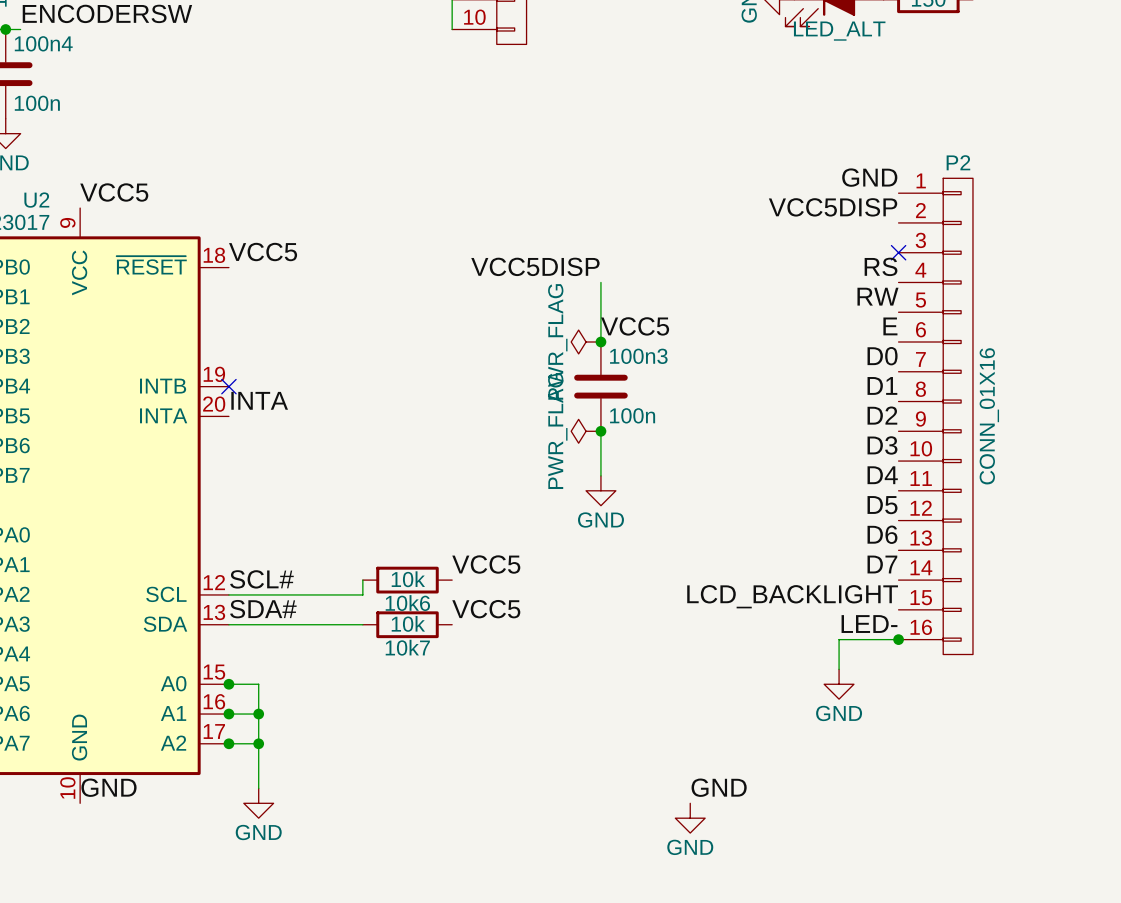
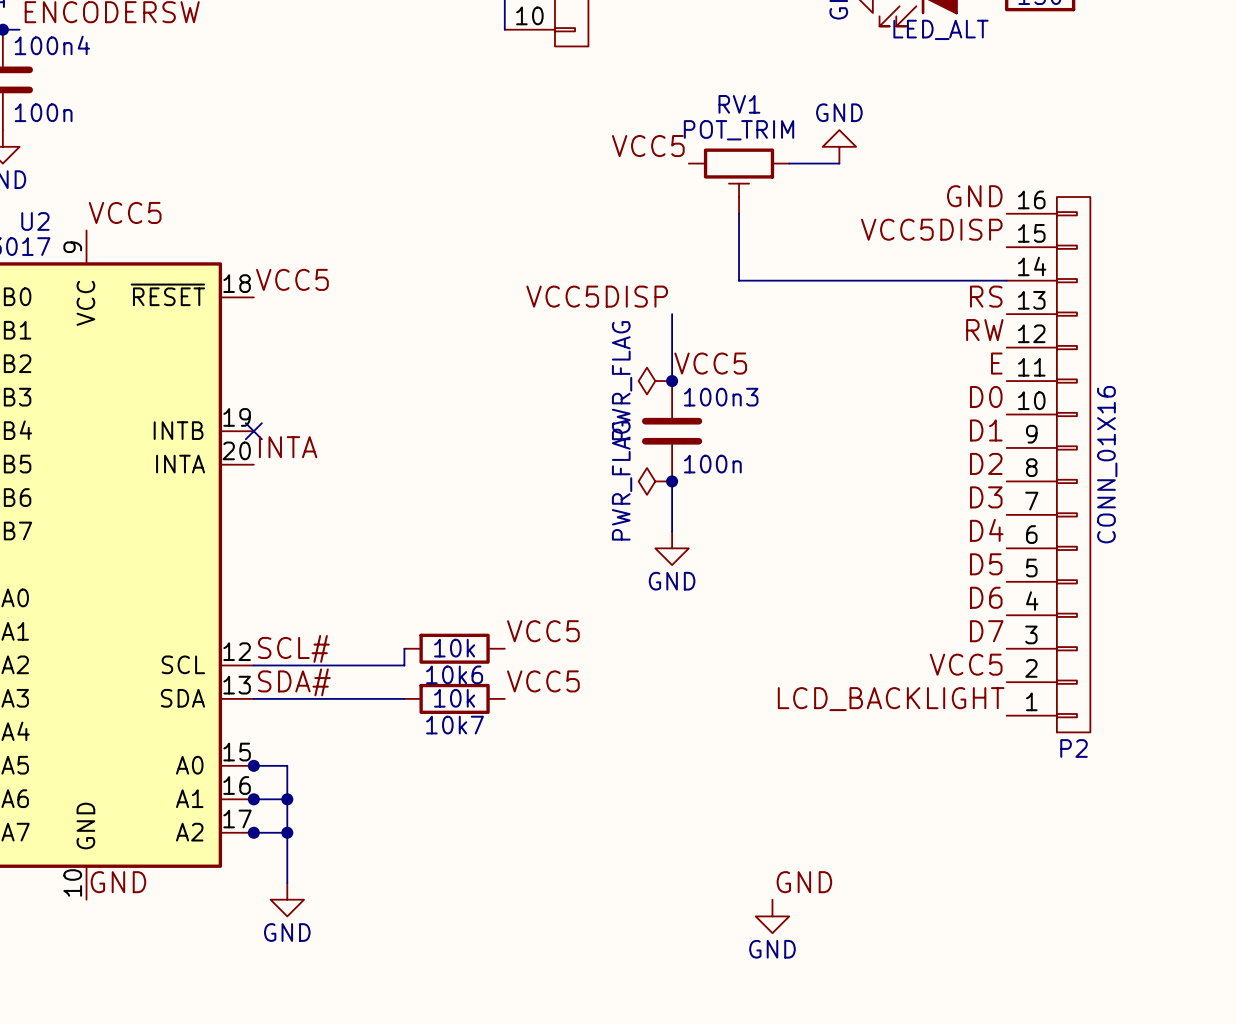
label: none -> VCC5 (648, 146)
power symbol: none -> GND (839, 146)
wire: none -> (789, 163) (839, 163)
RV1: none -> POT_TRIM (739, 181)
wire: none -> (739, 213) (739, 280) (1006, 280)
no-connect mark: (898, 252) -> none
P2 flip: as is (958, 416) -> up-down (1073, 464)
label: LCD_BACKLIGHT (792, 596) -> VCC5 (966, 664)
label: LED- (869, 624) -> LCD_BACKLIGHT (891, 699)
wire: (898, 639) (839, 639) (839, 669) -> none
junction: (898, 639) -> none
power symbol: GND (839, 684) -> none

